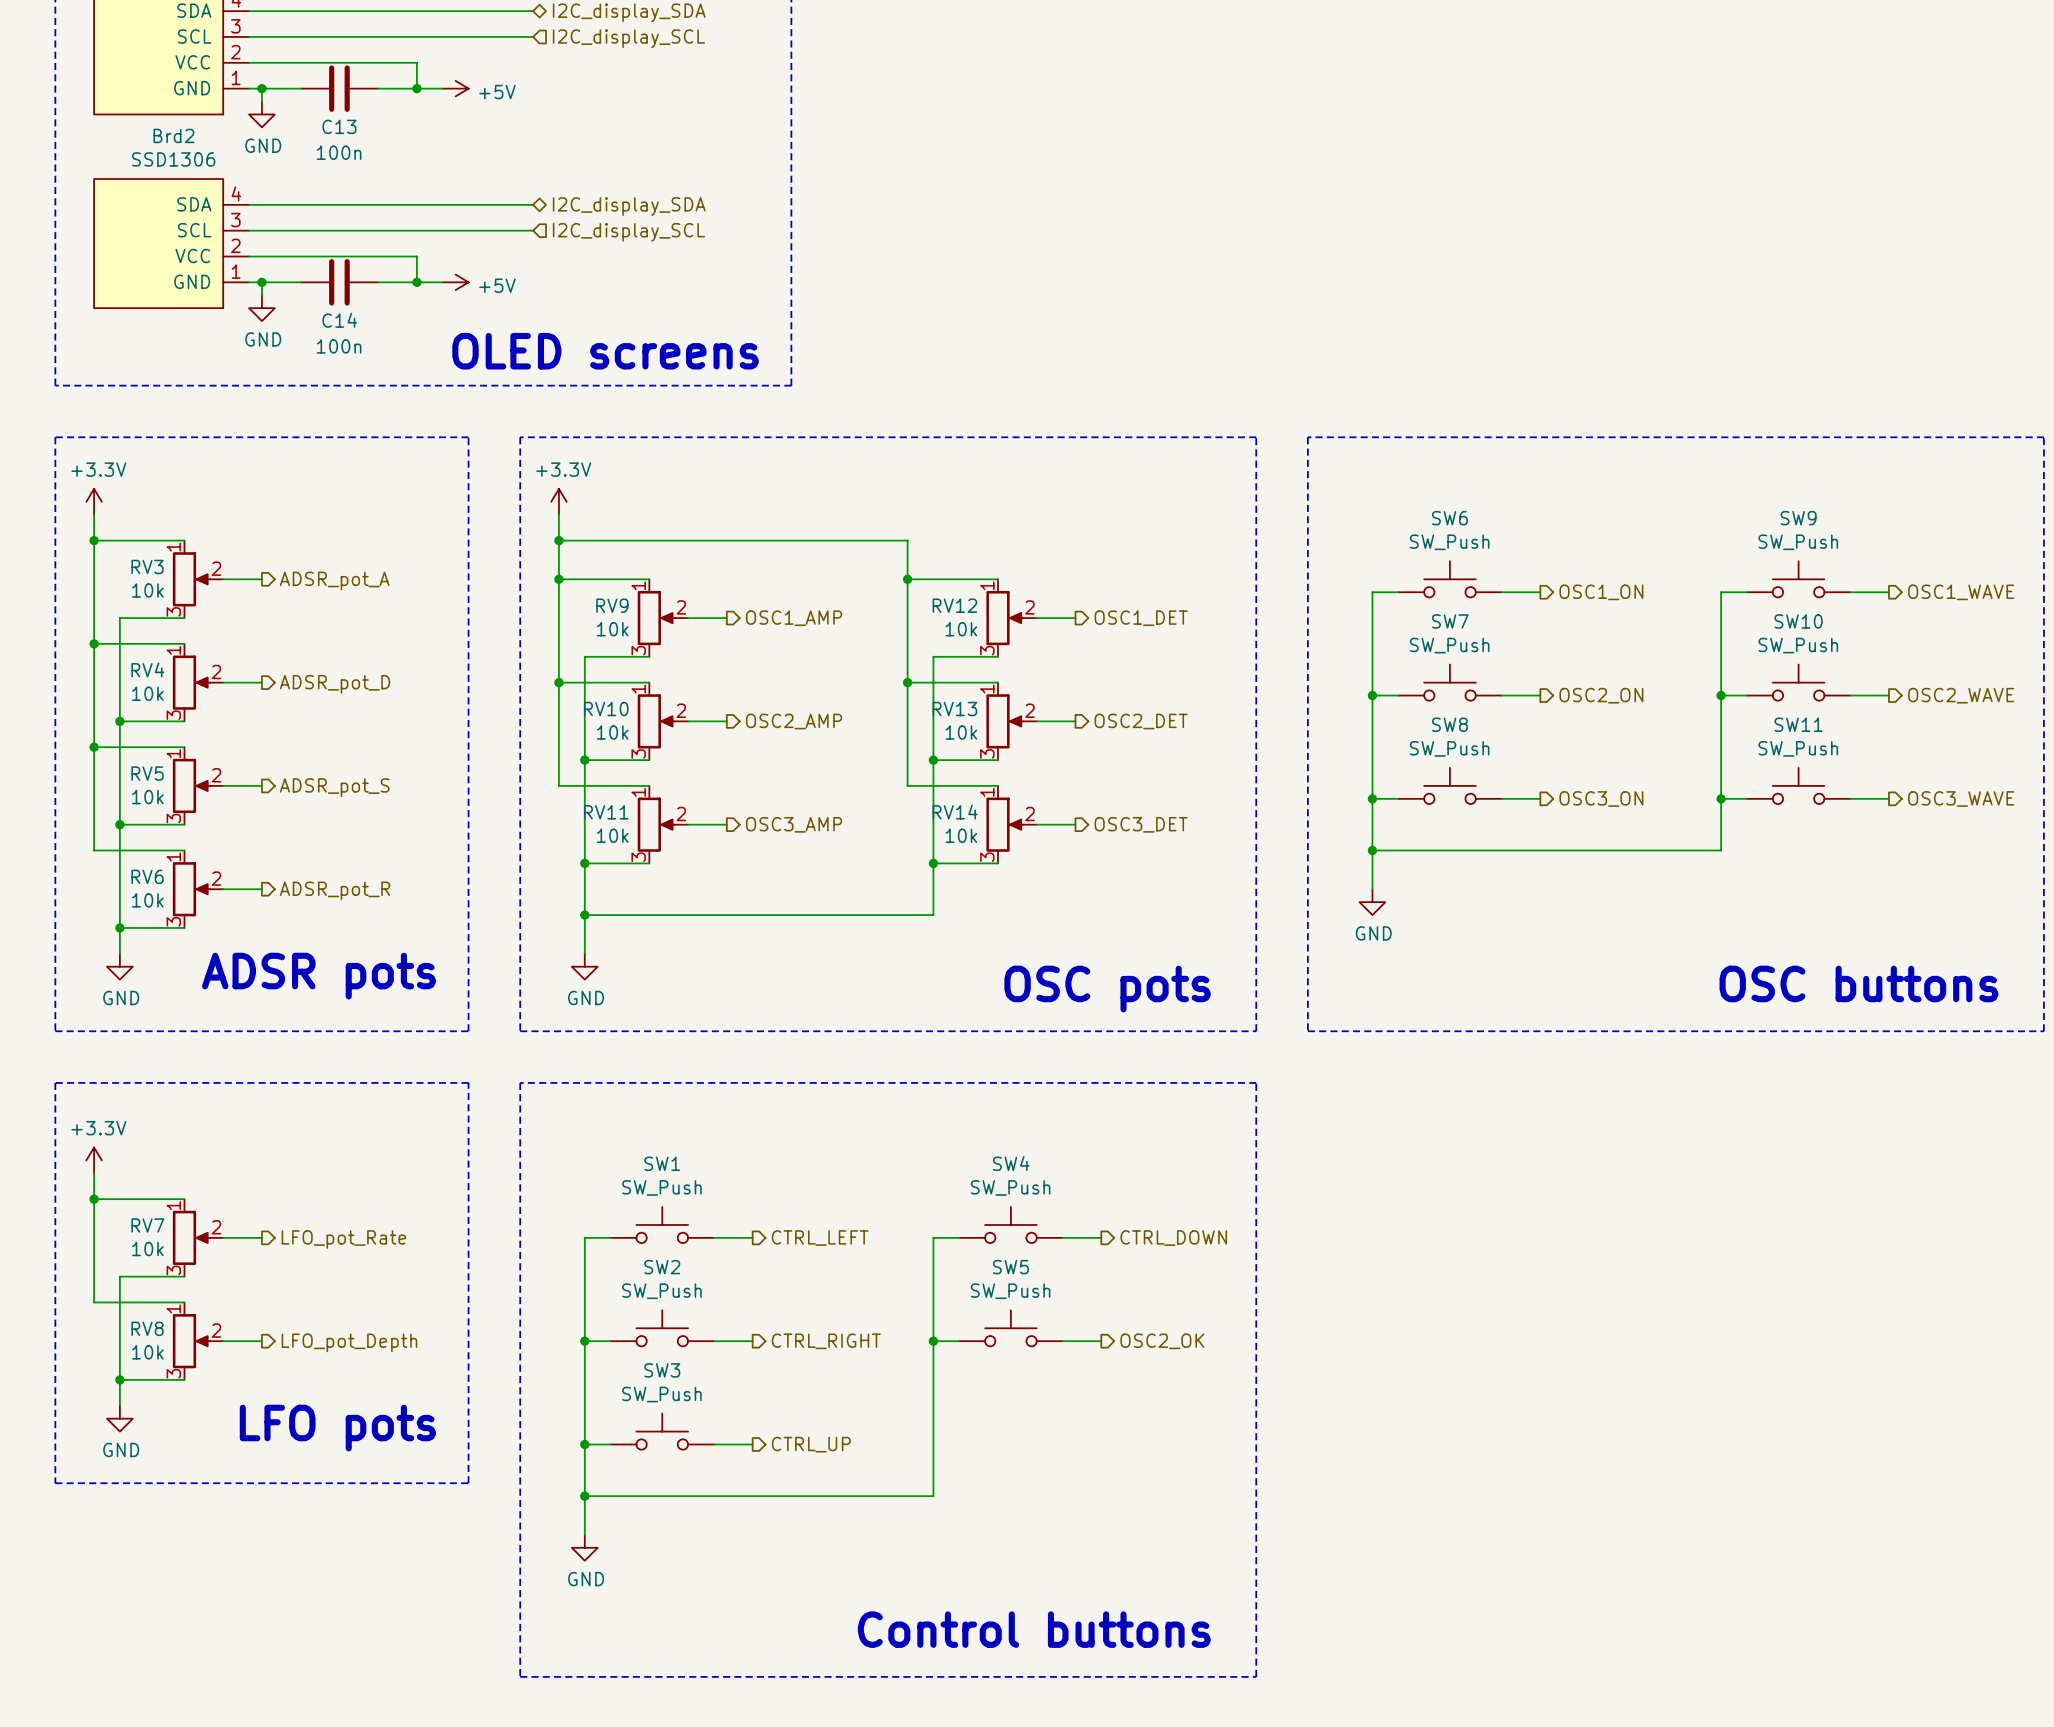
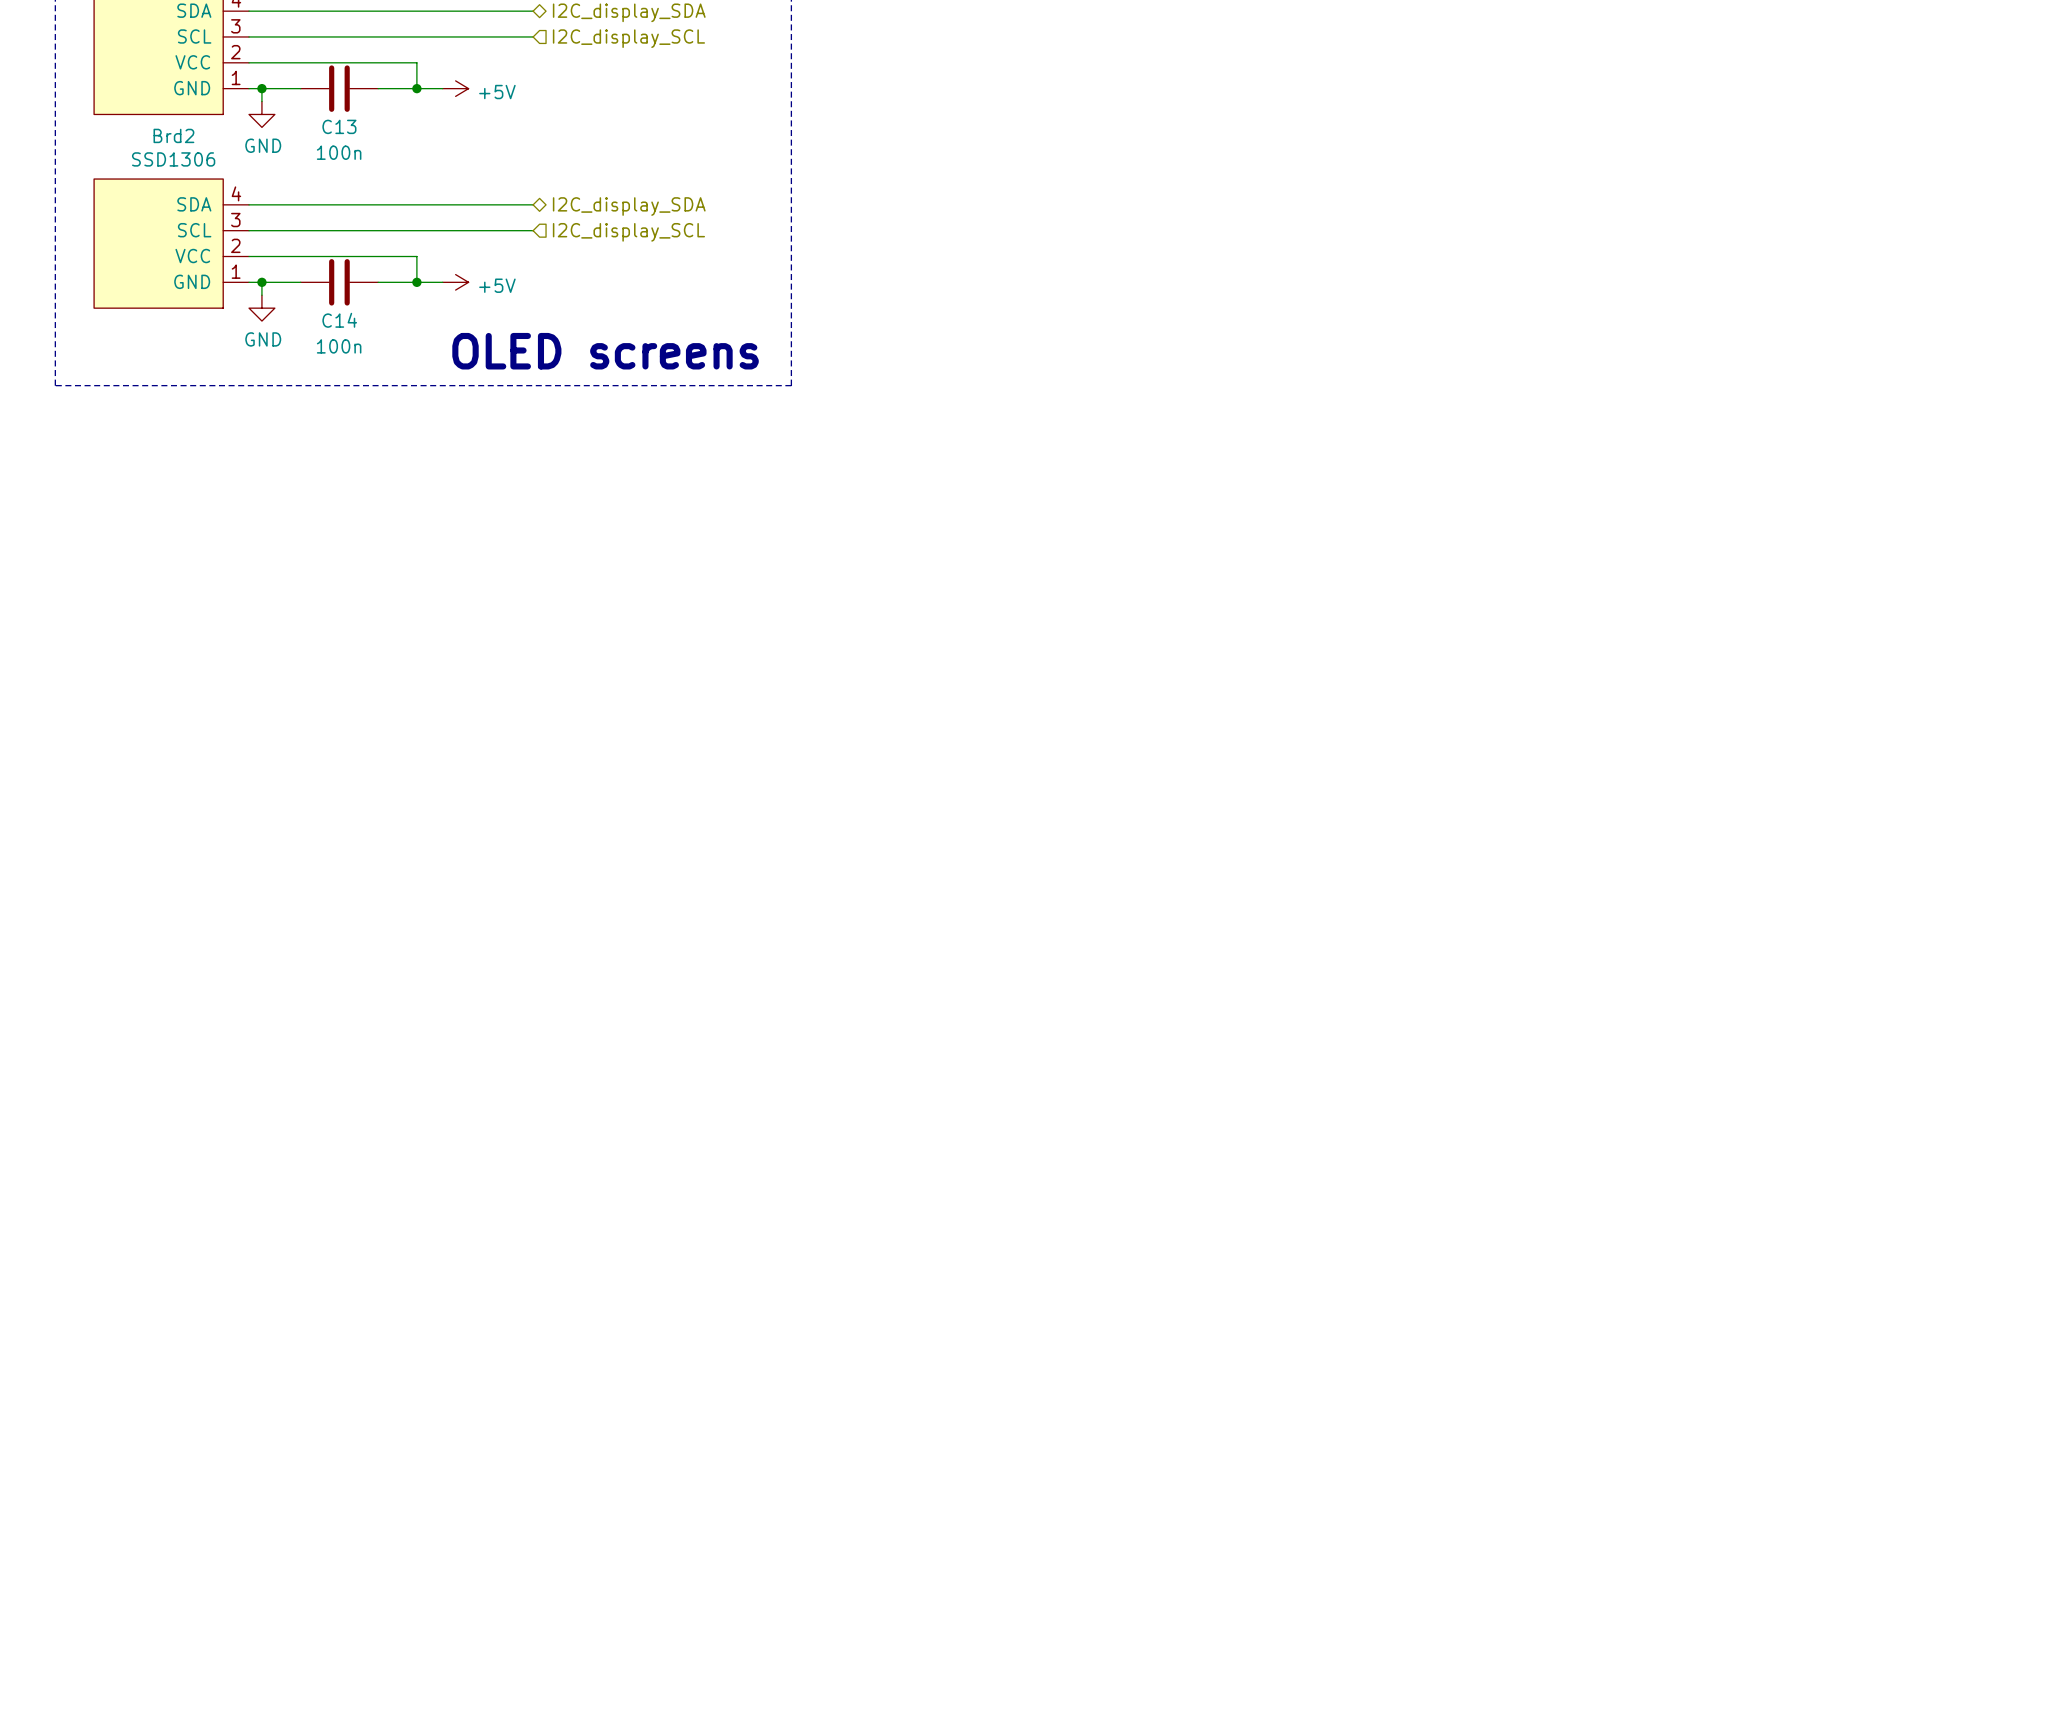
line: (55, 437) (55, 1031) (468, 1031) (468, 437) (55, 437) -> none
line: (520, 437) (1256, 437) (1256, 1031) (520, 1031) (520, 437) -> none
line: (1307, 437) (2043, 437) (2043, 1031) (1307, 1031) (1307, 437) -> none
power symbol: +3.3V (94, 501) -> none
power symbol: +3.3V (558, 501) -> none
wire: (94, 514) (94, 850) (184, 850) -> none
wire: (558, 514) (558, 785) (649, 785) -> none
wire: (94, 540) (184, 540) -> none
junction: (94, 540) -> none
wire: (558, 540) (907, 540) (907, 785) (997, 785) -> none
junction: (558, 540) -> none
RV3: 10k (198, 579) -> none
wire: (223, 579) (261, 579) -> none
wire: (558, 579) (649, 579) -> none
junction: (558, 579) -> none
wire: (907, 579) (997, 579) -> none
junction: (907, 579) -> none
SW6: SW_Push (1449, 579) -> none
SW9: SW_Push (1798, 579) -> none
hierarchical label: ADSR_pot_A (334, 581) -> none
wire: (1398, 592) (1372, 592) (1372, 889) -> none
wire: (1501, 592) (1540, 592) -> none
hierarchical label: OSC1_ON (1601, 592) -> none
wire: (1746, 592) (1721, 592) (1721, 850) (1372, 850) -> none
wire: (1850, 592) (1888, 592) -> none
hierarchical label: OSC1_WAVE (1961, 592) -> none
wire: (184, 618) (119, 618) (119, 953) -> none
RV9: 10k (662, 618) -> none
wire: (688, 618) (726, 618) -> none
hierarchical label: OSC1_AMP (794, 618) -> none
RV12: 10k (1011, 618) -> none
wire: (1036, 618) (1075, 618) -> none
hierarchical label: OSC1_DET (1141, 618) -> none
wire: (94, 643) (184, 643) -> none
junction: (94, 643) -> none
wire: (649, 656) (584, 656) (584, 953) -> none
wire: (997, 656) (933, 656) (933, 915) (584, 915) -> none
RV4: 10k (198, 682) -> none
wire: (223, 682) (261, 682) -> none
wire: (558, 682) (649, 682) -> none
junction: (558, 682) -> none
wire: (907, 682) (997, 682) -> none
junction: (907, 682) -> none
SW7: SW_Push (1449, 682) -> none
SW10: SW_Push (1798, 682) -> none
hierarchical label: ADSR_pot_D (335, 684) -> none
wire: (1372, 695) (1398, 695) -> none
junction: (1372, 695) -> none
wire: (1501, 695) (1540, 695) -> none
hierarchical label: OSC2_ON (1601, 695) -> none
wire: (1721, 695) (1746, 695) -> none
junction: (1721, 695) -> none
wire: (1850, 695) (1888, 695) -> none
hierarchical label: OSC2_WAVE (1961, 695) -> none
wire: (119, 721) (184, 721) -> none
junction: (119, 721) -> none
RV10: 10k (662, 721) -> none
wire: (688, 721) (726, 721) -> none
hierarchical label: OSC2_AMP (794, 721) -> none
RV13: 10k (1011, 721) -> none
wire: (1036, 721) (1075, 721) -> none
hierarchical label: OSC2_DET (1141, 721) -> none
wire: (94, 747) (184, 747) -> none
junction: (94, 747) -> none
wire: (584, 760) (649, 760) -> none
junction: (584, 760) -> none
wire: (933, 760) (997, 760) -> none
junction: (933, 760) -> none
RV5: 10k (198, 785) -> none
wire: (223, 785) (261, 785) -> none
SW8: SW_Push (1449, 785) -> none
SW11: SW_Push (1798, 785) -> none
hierarchical label: ADSR_pot_S (334, 787) -> none
wire: (1372, 798) (1398, 798) -> none
junction: (1372, 798) -> none
wire: (1501, 798) (1540, 798) -> none
hierarchical label: OSC3_ON (1601, 798) -> none
wire: (1721, 798) (1746, 798) -> none
junction: (1721, 798) -> none
wire: (1850, 798) (1888, 798) -> none
hierarchical label: OSC3_WAVE (1961, 798) -> none
wire: (119, 824) (184, 824) -> none
junction: (119, 824) -> none
RV11: 10k (662, 824) -> none
wire: (688, 824) (726, 824) -> none
hierarchical label: OSC3_AMP (794, 824) -> none
RV14: 10k (1011, 824) -> none
wire: (1036, 824) (1075, 824) -> none
hierarchical label: OSC3_DET (1141, 824) -> none
junction: (1372, 850) -> none
wire: (584, 863) (649, 863) -> none
junction: (584, 863) -> none
wire: (933, 863) (997, 863) -> none
junction: (933, 863) -> none
RV6: 10k (198, 889) -> none
wire: (223, 889) (261, 889) -> none
hierarchical label: ADSR_pot_R (335, 890) -> none
power symbol: GND (1372, 902) -> none
junction: (584, 915) -> none
wire: (119, 927) (184, 927) -> none
junction: (119, 927) -> none
power symbol: GND (119, 966) -> none
power symbol: GND (584, 966) -> none
text: ADSR pots (319, 976) -> none
text: OSC buttons (1858, 983) -> none
text: OSC pots (1107, 989) -> none
line: (55, 1082) (55, 1483) (468, 1483) (468, 1082) (55, 1082) -> none
line: (520, 1082) (1256, 1082) (1256, 1676) (520, 1676) (520, 1082) -> none
power symbol: +3.3V (94, 1160) -> none
wire: (94, 1173) (94, 1302) (184, 1302) -> none
wire: (94, 1199) (184, 1199) -> none
junction: (94, 1199) -> none
SW1: SW_Push (662, 1224) -> none
SW4: SW_Push (1010, 1224) -> none
RV7: 10k (198, 1237) -> none
wire: (223, 1237) (261, 1237) -> none
wire: (610, 1237) (584, 1237) (584, 1534) -> none
wire: (713, 1237) (752, 1237) -> none
wire: (959, 1237) (933, 1237) (933, 1496) (584, 1496) -> none
wire: (1062, 1237) (1101, 1237) -> none
hierarchical label: CTRL_LEFT (820, 1238) -> none
hierarchical label: CTRL_DOWN (1173, 1238) -> none
hierarchical label: LFO_pot_Rate (343, 1239) -> none
wire: (184, 1276) (119, 1276) (119, 1405) -> none
SW2: SW_Push (662, 1328) -> none
SW5: SW_Push (1010, 1328) -> none
RV8: 10k (198, 1341) -> none
wire: (223, 1341) (261, 1341) -> none
wire: (584, 1341) (610, 1341) -> none
junction: (584, 1341) -> none
wire: (713, 1341) (752, 1341) -> none
hierarchical label: CTRL_RIGHT (826, 1341) -> none
wire: (933, 1341) (959, 1341) -> none
junction: (933, 1341) -> none
wire: (1062, 1341) (1101, 1341) -> none
hierarchical label: OSC2_OK (1162, 1341) -> none
hierarchical label: LFO_pot_Depth (349, 1342) -> none
wire: (119, 1379) (184, 1379) -> none
junction: (119, 1379) -> none
power symbol: GND (119, 1418) -> none
text: LFO pots (337, 1428) -> none
SW3: SW_Push (662, 1431) -> none
wire: (584, 1444) (610, 1444) -> none
junction: (584, 1444) -> none
wire: (713, 1444) (752, 1444) -> none
hierarchical label: CTRL_UP (811, 1444) -> none
junction: (584, 1496) -> none
power symbol: GND (584, 1547) -> none
text: Control buttons (1034, 1629) -> none

